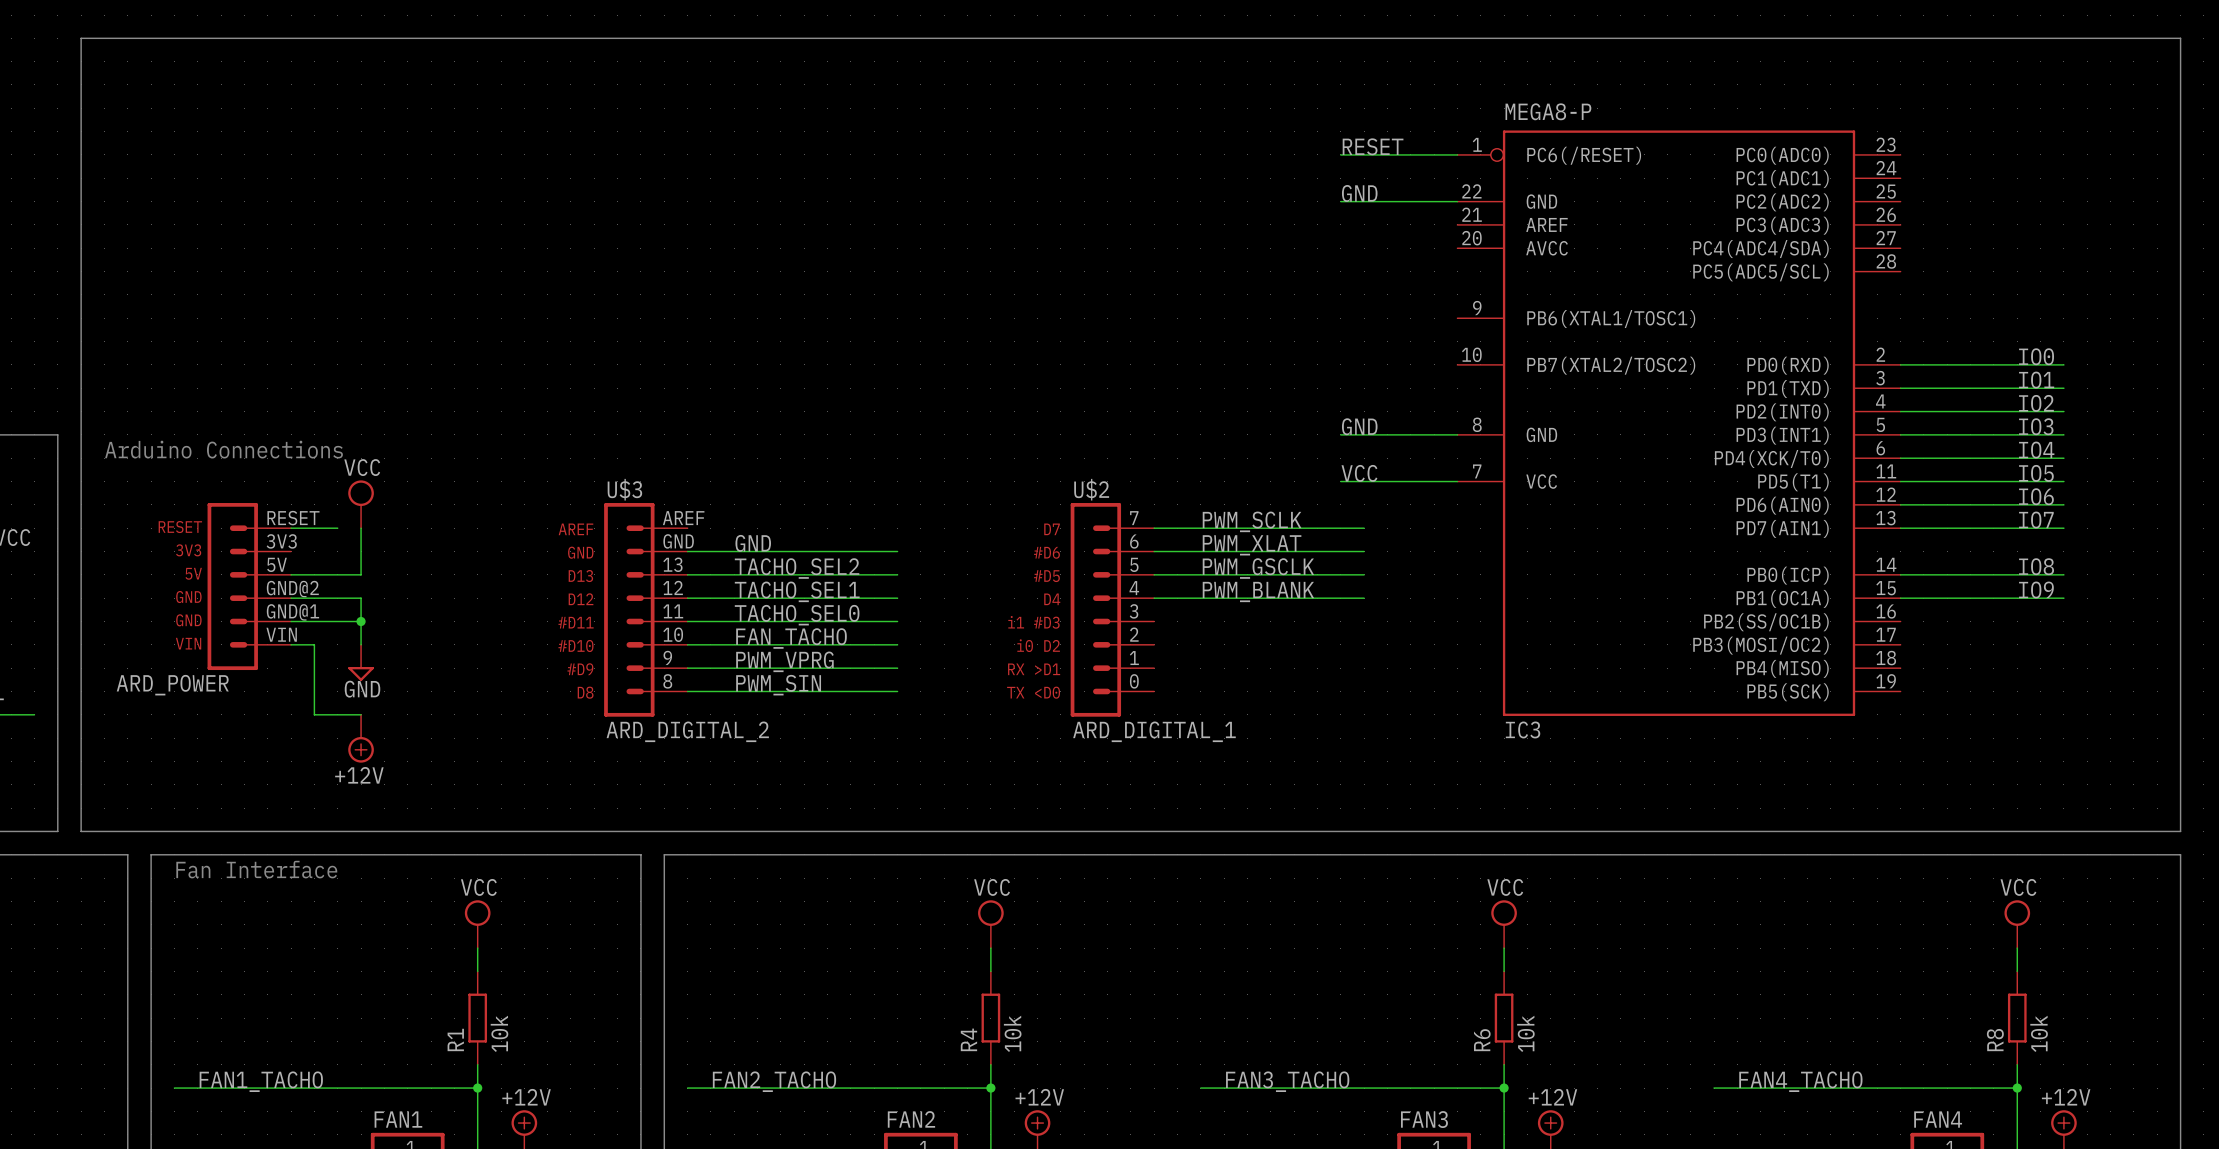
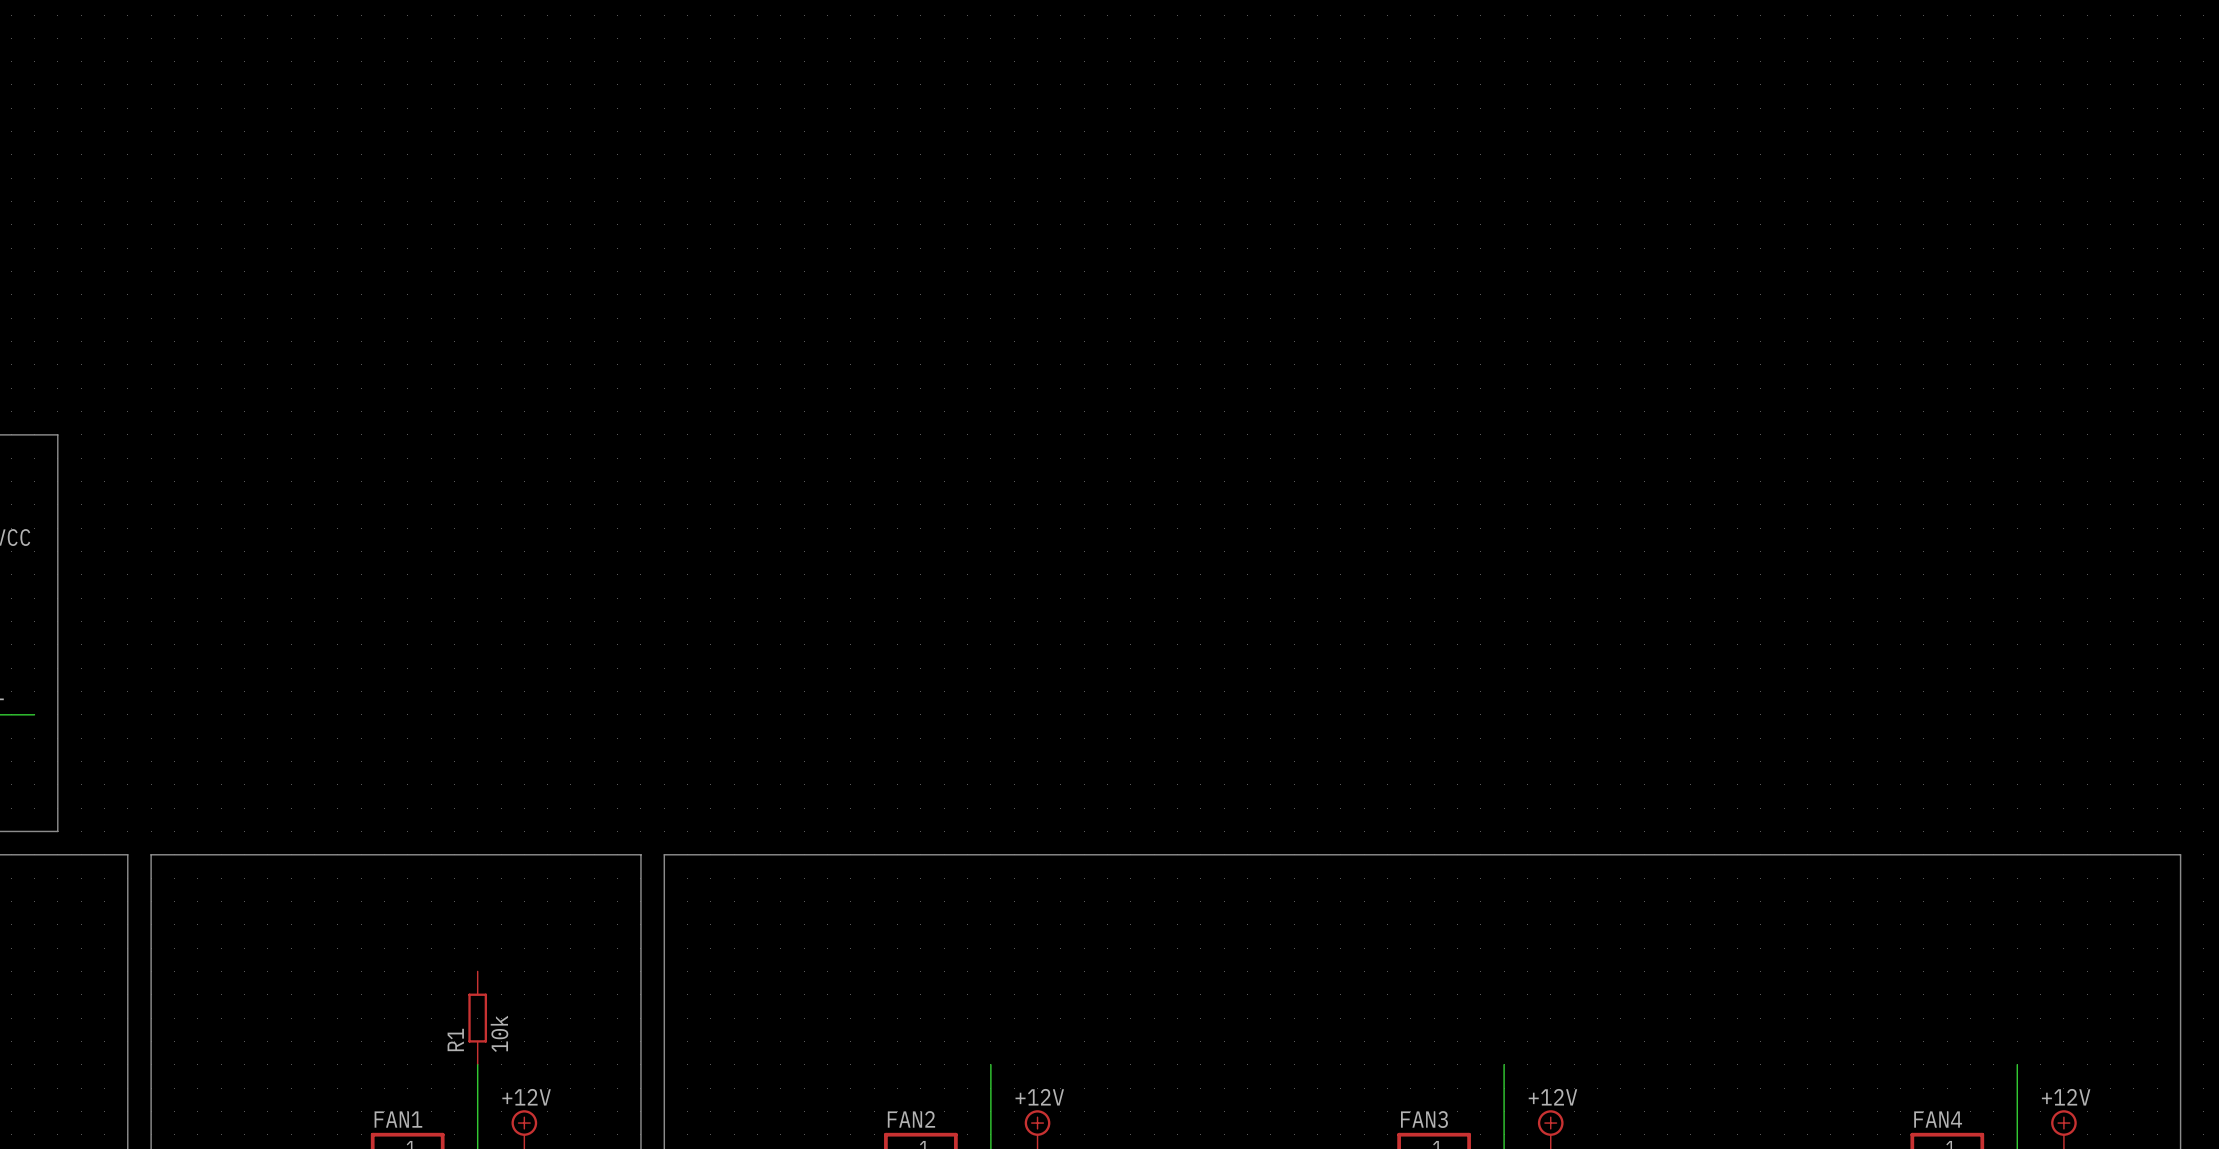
line: (81, 38) (2180, 38) (2180, 831) (81, 831) (81, 38) -> none
label: RESET (1373, 146) -> none
wire: (1340, 154) (1457, 154) -> none
label: GND (1359, 193) -> none
wire: (1340, 201) (1457, 201) -> none
label: IO0 (2036, 356) -> none
wire: (1900, 364) (2063, 364) -> none
label: IO1 (2036, 380) -> none
wire: (1900, 388) (2063, 388) -> none
label: IO2 (2036, 403) -> none
wire: (1900, 411) (2063, 411) -> none
IC3: MEGA8-P (1679, 423) -> none
label: GND (1359, 426) -> none
label: IO3 (2036, 426) -> none
wire: (1340, 434) (1457, 434) -> none
wire: (1900, 434) (2063, 434) -> none
text: Arduino Connections (223, 449) -> none
label: IO4 (2036, 450) -> none
wire: (1900, 458) (2063, 458) -> none
label: VCC (1359, 473) -> none
label: IO5 (2036, 473) -> none
wire: (1340, 481) (1457, 481) -> none
wire: (1900, 481) (2063, 481) -> none
label: IO6 (2036, 496) -> none
power symbol: VCC (361, 504) -> none
wire: (1900, 504) (2063, 504) -> none
label: IO7 (2036, 520) -> none
label: PWM_SCLK (1252, 521) -> none
wire: (291, 528) (337, 528) -> none
wire: (361, 528) (361, 574) (291, 574) -> none
wire: (1154, 528) (1364, 528) -> none
wire: (1900, 528) (2063, 528) -> none
label: GND (753, 543) -> none
label: PWM_XLAT (1252, 545) -> none
wire: (687, 551) (897, 551) -> none
wire: (1154, 551) (1364, 551) -> none
label: IO8 (2036, 566) -> none
label: TACHO_SEL2 (797, 568) -> none
label: PWM_GSCLK (1258, 568) -> none
wire: (687, 574) (897, 574) -> none
wire: (1154, 574) (1364, 574) -> none
wire: (1900, 574) (2063, 574) -> none
part: ARD_POWER (249, 586) -> none
label: IO9 (2036, 590) -> none
label: TACHO_SEL1 (797, 591) -> none
label: PWM_BLANK (1258, 591) -> none
wire: (291, 598) (361, 598) (361, 644) -> none
wire: (687, 598) (897, 598) -> none
wire: (1154, 598) (1364, 598) -> none
wire: (1900, 598) (2063, 598) -> none
U$3: ARD_DIGITAL_2 (645, 609) -> none
U$2: ARD_DIGITAL_1 (1112, 609) -> none
label: TACHO_SEL0 (797, 615) -> none
wire: (291, 621) (361, 621) -> none
junction: (361, 621) -> none
wire: (687, 621) (897, 621) -> none
label: FAN_TACHO (791, 638) -> none
wire: (291, 644) (314, 644) (314, 714) (361, 714) -> none
wire: (687, 644) (897, 644) -> none
label: PWM_VPRG (784, 661) -> none
power symbol: GND (361, 662) -> none
wire: (687, 668) (897, 668) -> none
label: PWM_SIN (778, 685) -> none
wire: (687, 691) (897, 691) -> none
power symbol: +12V (361, 738) -> none
text: Fan Interface (256, 869) -> none
power symbol: VCC (477, 924) -> none
power symbol: VCC (990, 924) -> none
power symbol: VCC (1504, 924) -> none
power symbol: VCC (2017, 924) -> none
wire: (477, 948) (477, 971) -> none
wire: (990, 948) (990, 971) -> none
wire: (1504, 948) (1504, 971) -> none
wire: (2017, 948) (2017, 971) -> none
R4: 10k (990, 1018) -> none
R6: 10k (1504, 1018) -> none
R8: 10k (2017, 1018) -> none
label: FAN1_TACHO (261, 1081) -> none
label: FAN2_TACHO (774, 1081) -> none
label: FAN3_TACHO (1287, 1081) -> none
label: FAN4_TACHO (1800, 1081) -> none
wire: (174, 1088) (477, 1088) -> none
junction: (477, 1088) -> none
wire: (687, 1088) (990, 1088) -> none
junction: (990, 1088) -> none
wire: (1200, 1088) (1504, 1088) -> none
junction: (1504, 1088) -> none
wire: (1714, 1088) (2017, 1088) -> none
junction: (2017, 1088) -> none

